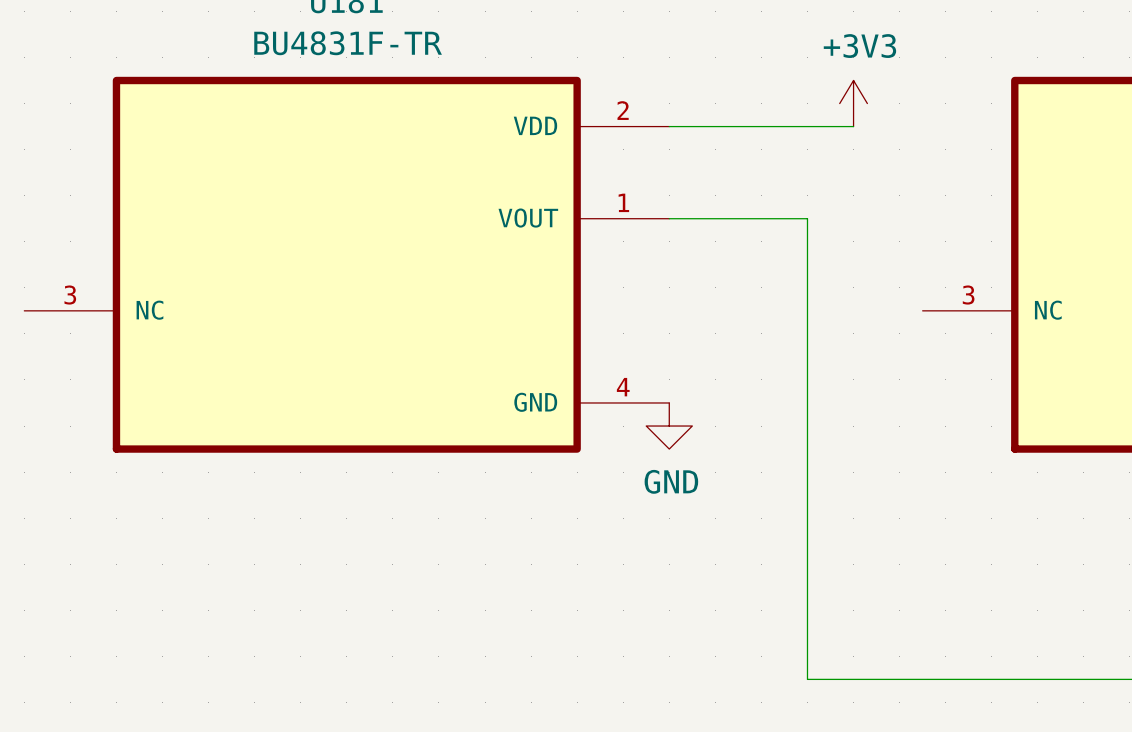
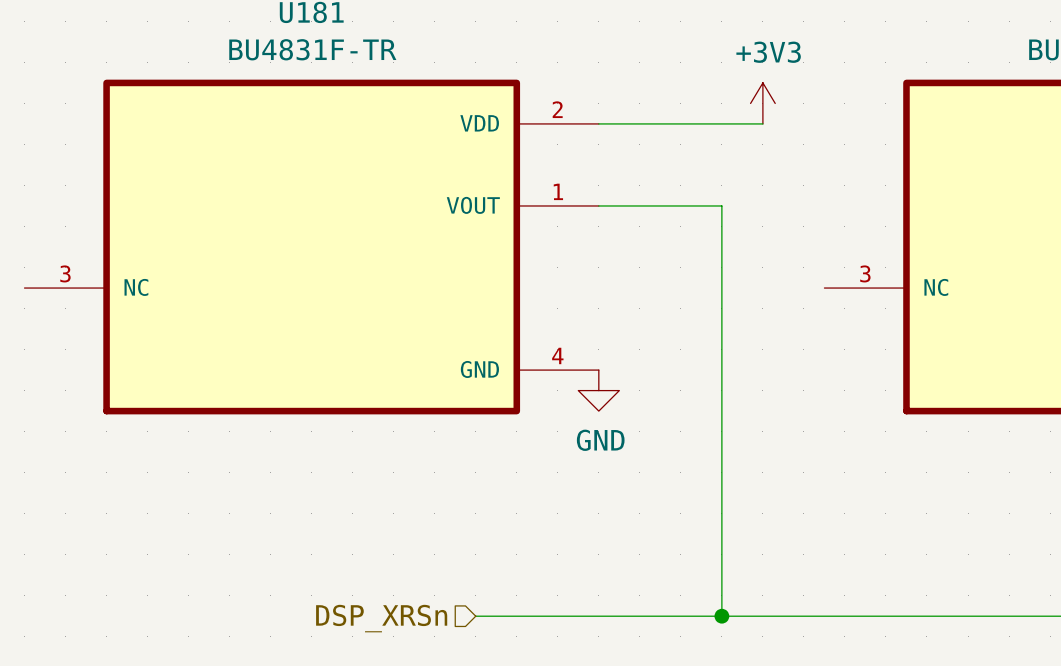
wire: none -> (475, 616) (721, 616)
junction: none -> (721, 616)
hierarchical label: none -> DSP_XRSn (381, 618)

